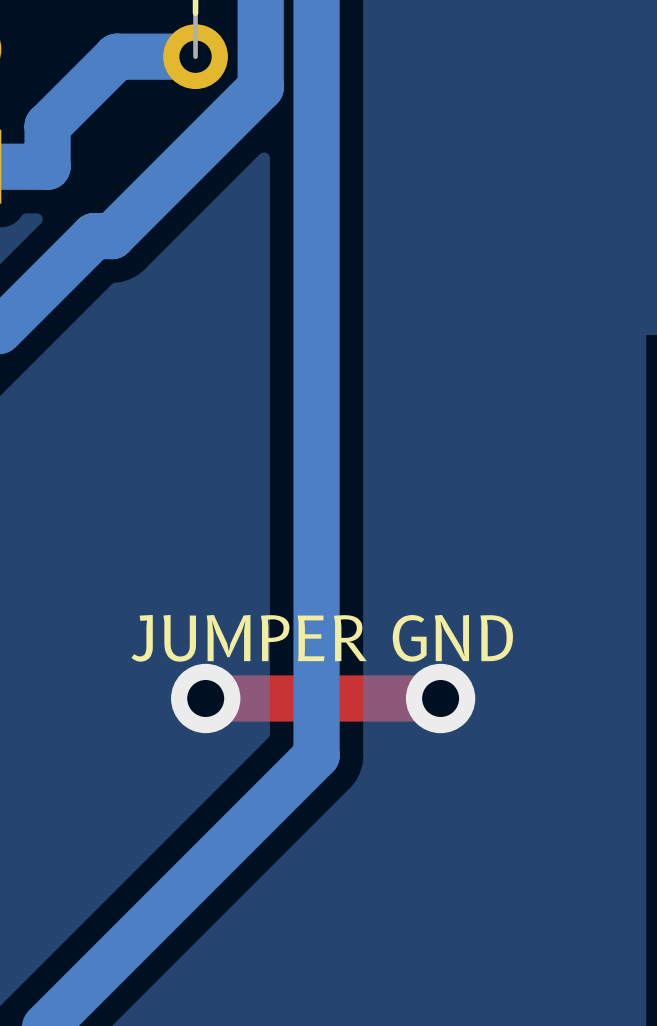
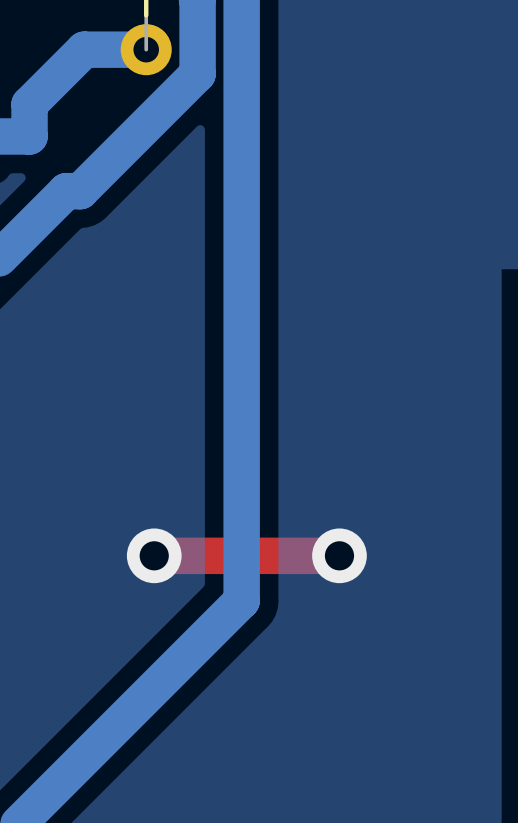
text: JUMPER GND (322, 638) -> none

